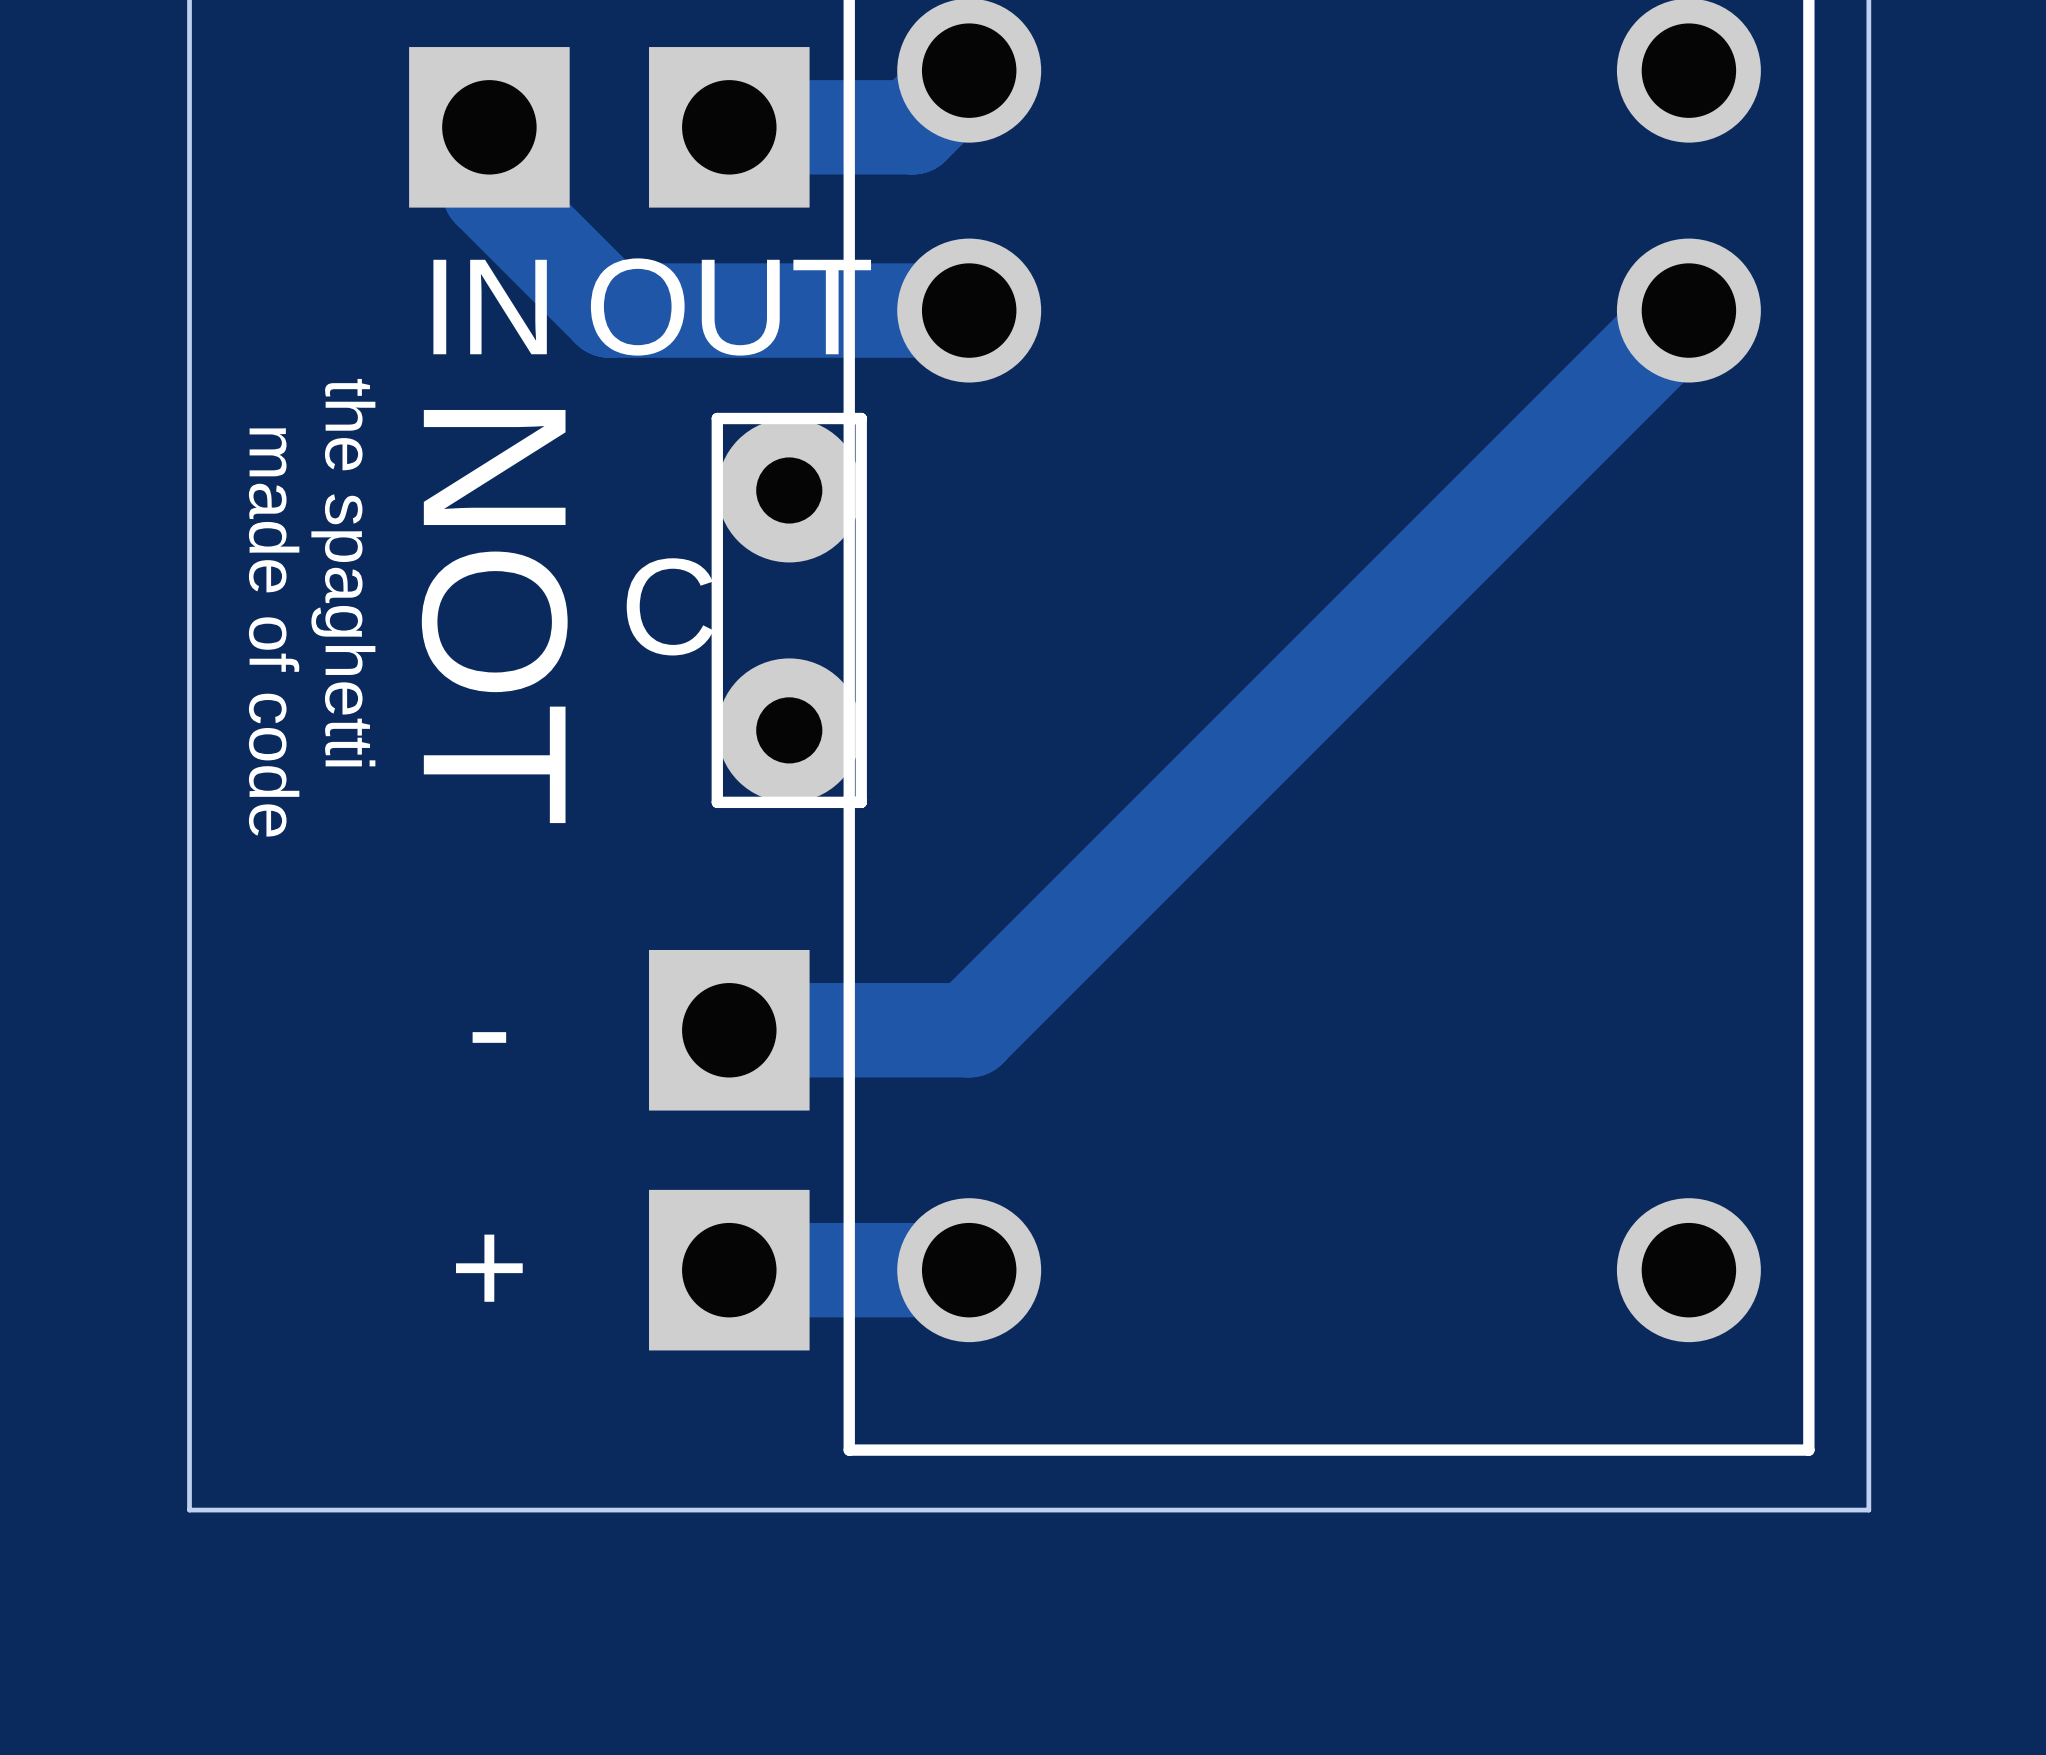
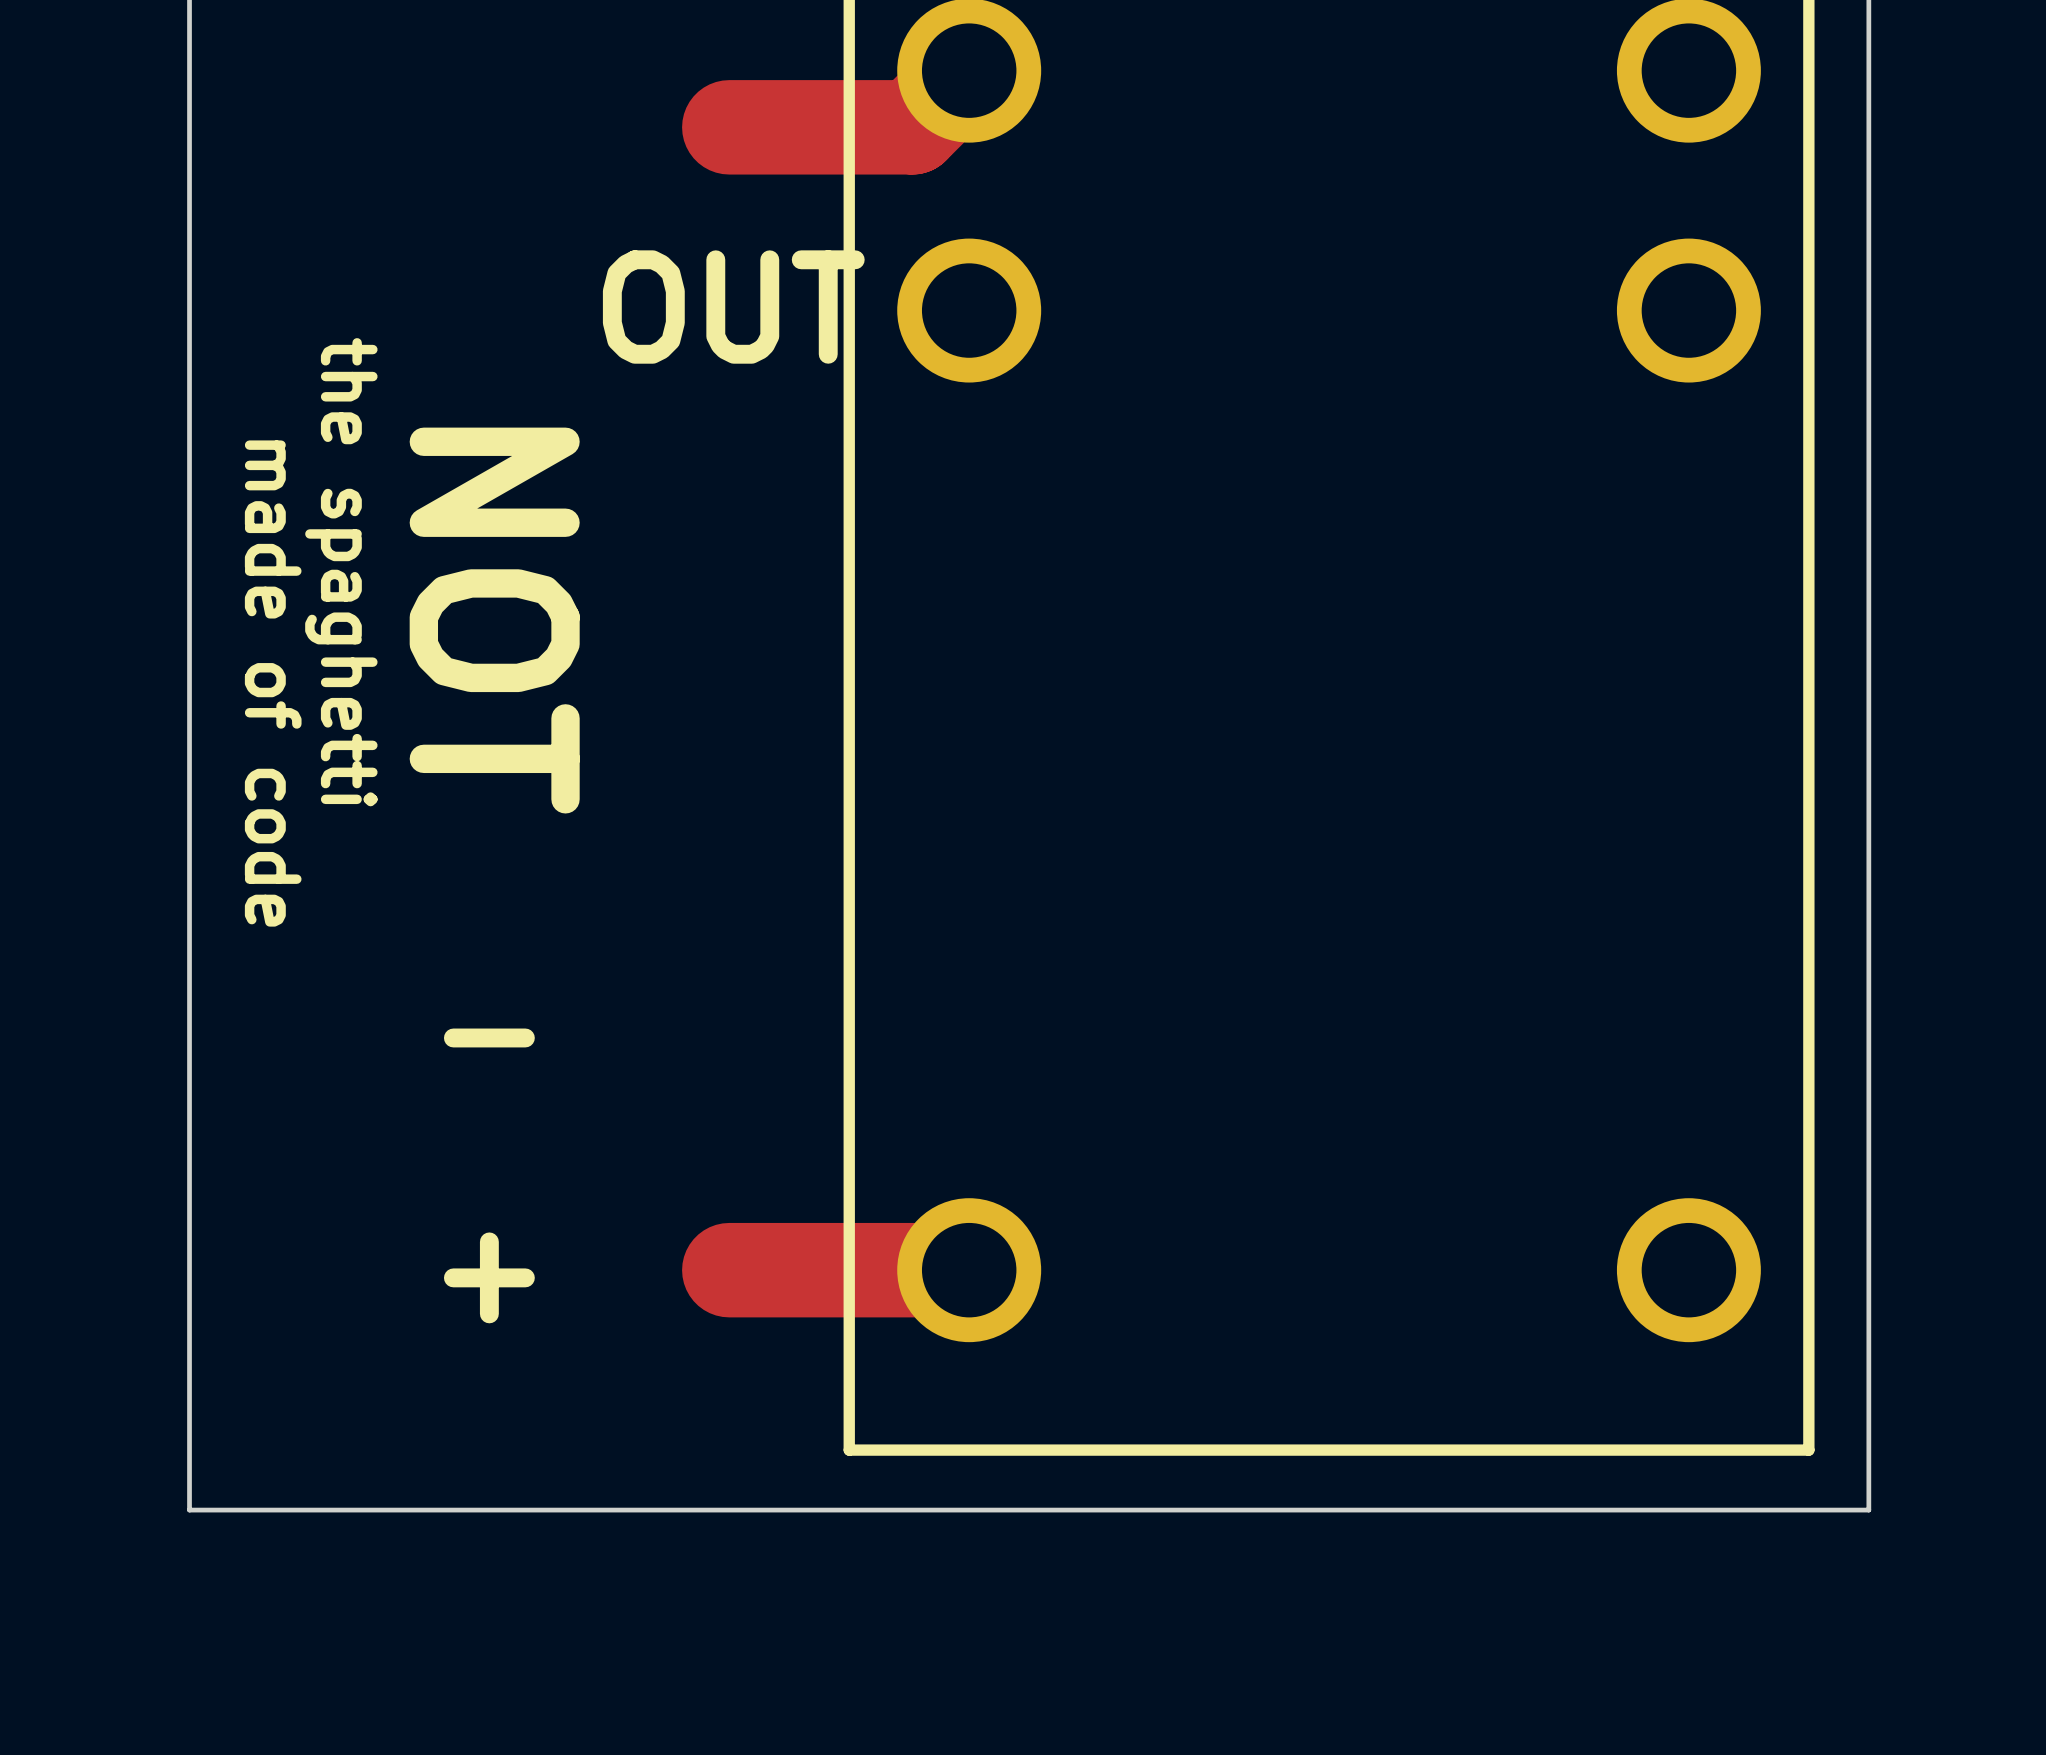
track: (489, 127) (489, 190) (609, 310) (969, 310) -> none
part: (489, 127) -> none
part: (729, 127) -> none
text: IN (490, 307) -> none
track: (1688, 310) (969, 1030) (729, 1030) -> none
text: C (670, 606) -> none
part: (789, 610) -> none
part: (729, 1030) -> none
part: (729, 1270) -> none

